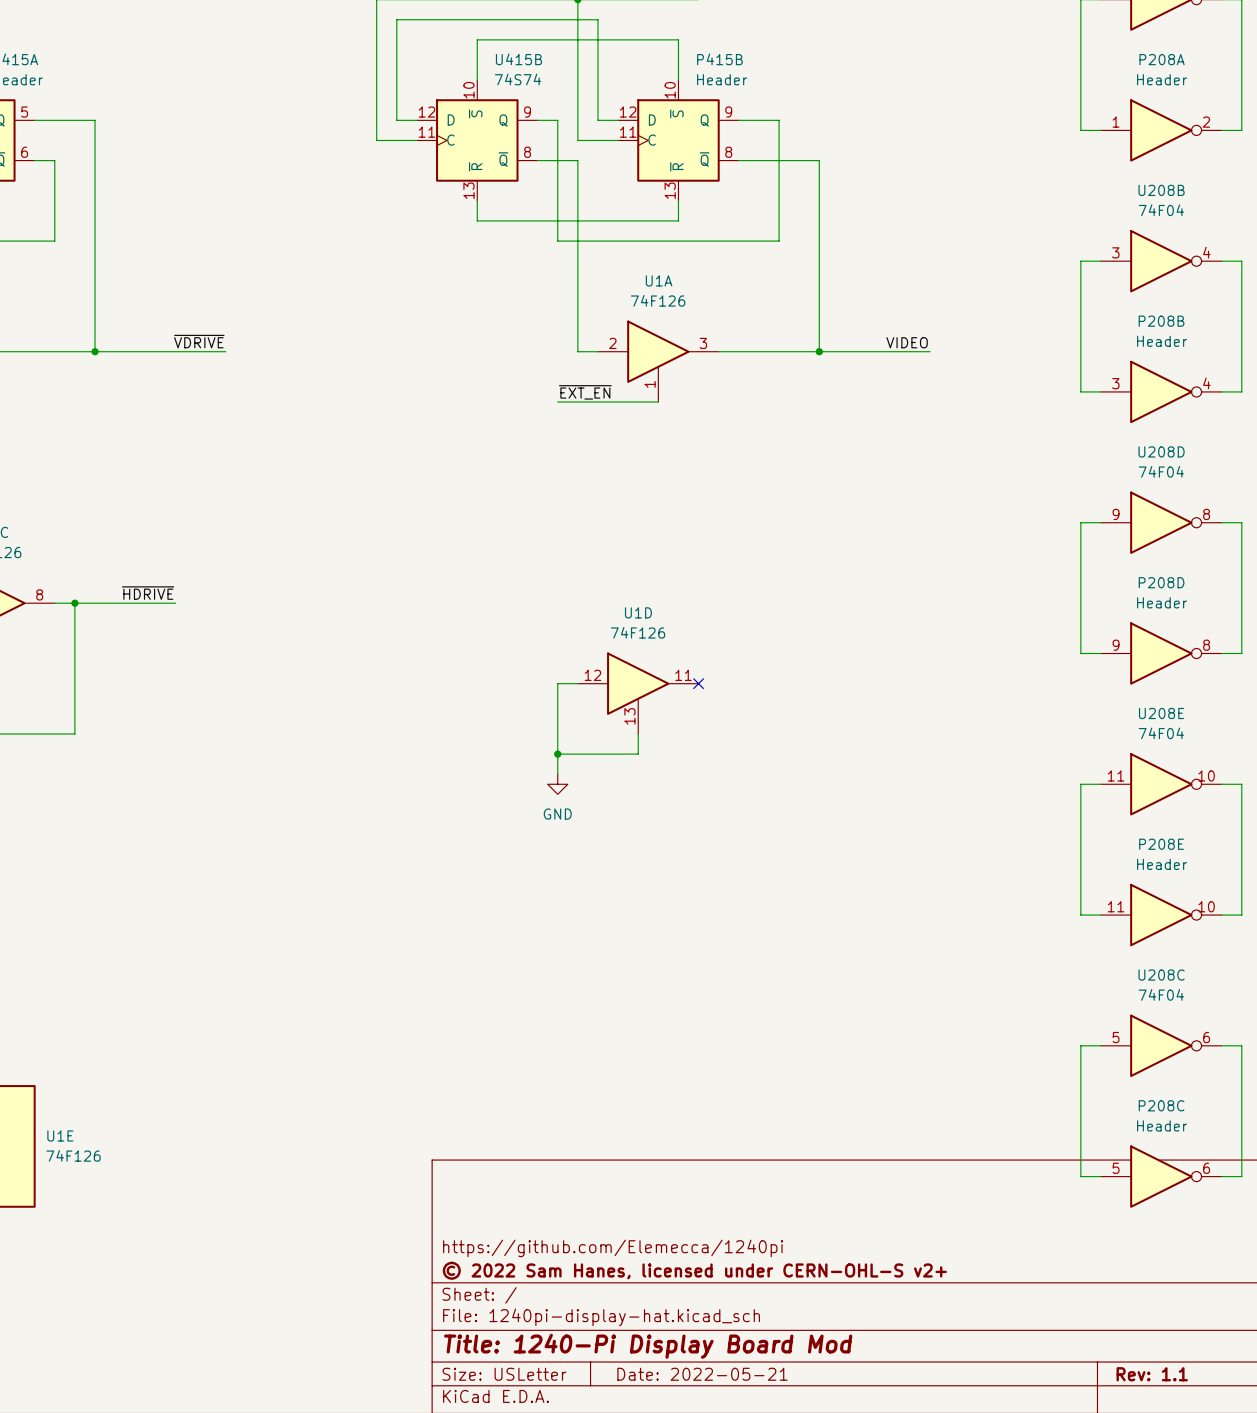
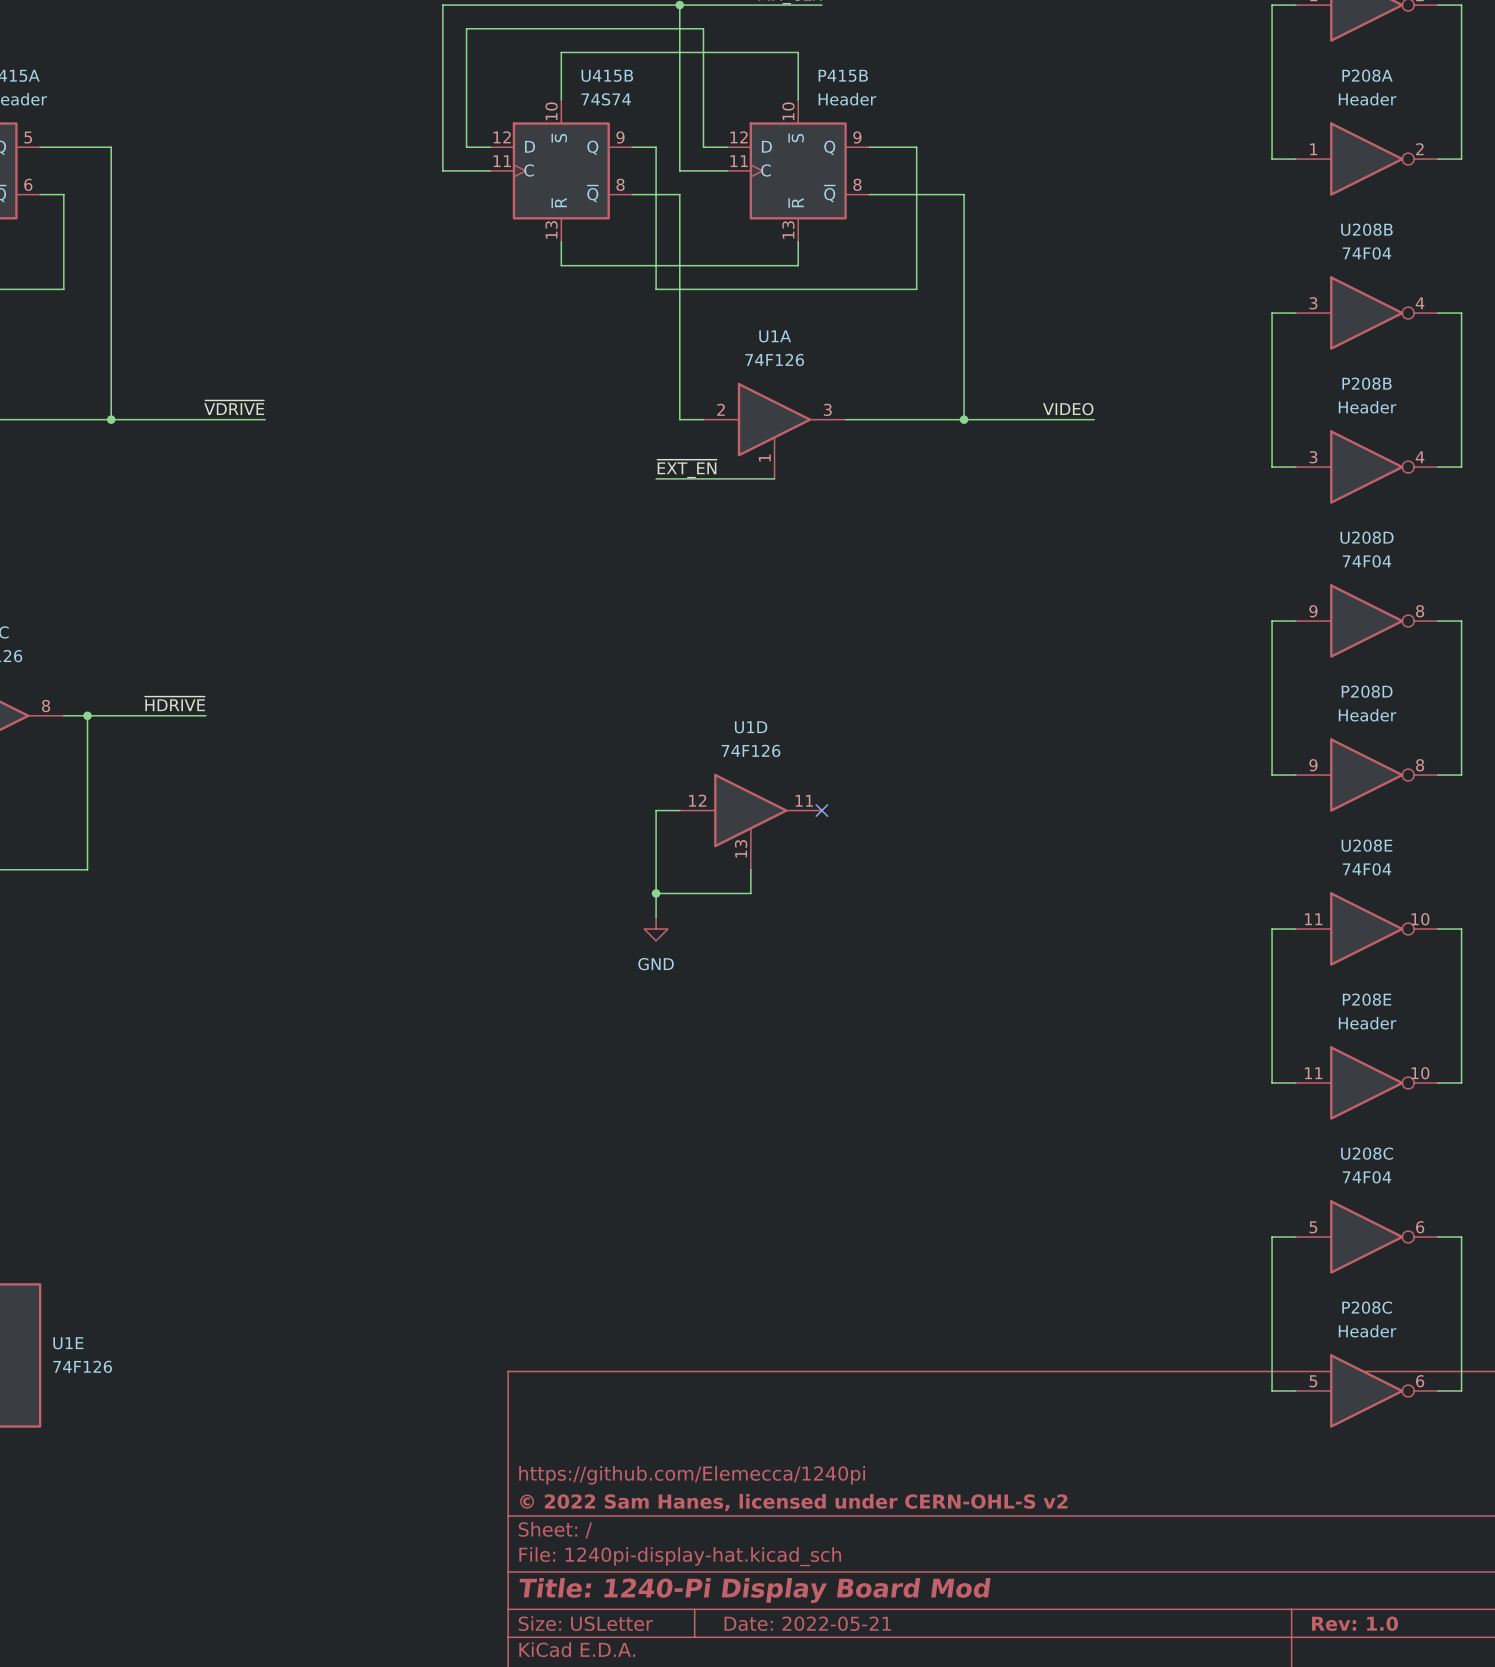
title block: © 2022 Sam Hanes, licensed under CERN-OHL-S v2+ (694, 1270) -> © 2022 Sam Hanes, licensed under CERN-OHL-S v2 (793, 1502)
title block: Rev: 1.1 (1152, 1374) -> Rev: 1.0 (1355, 1623)

